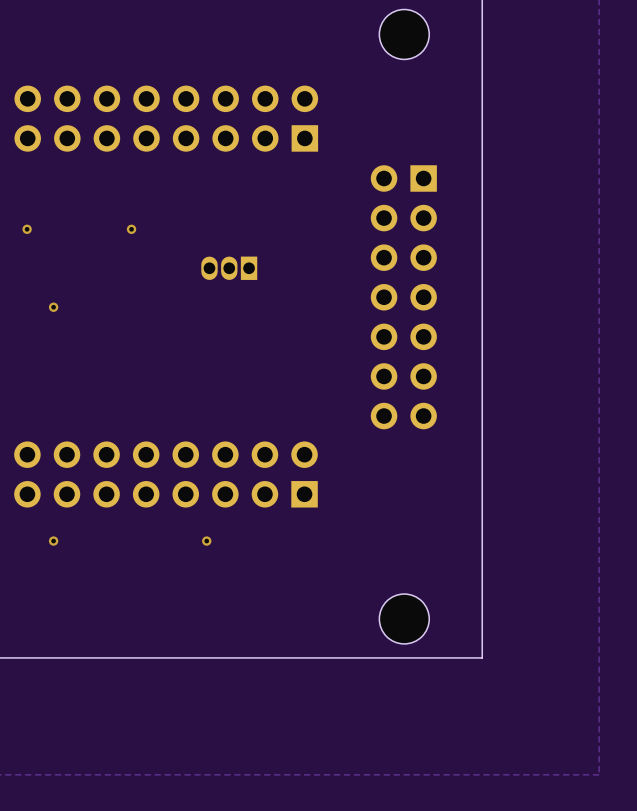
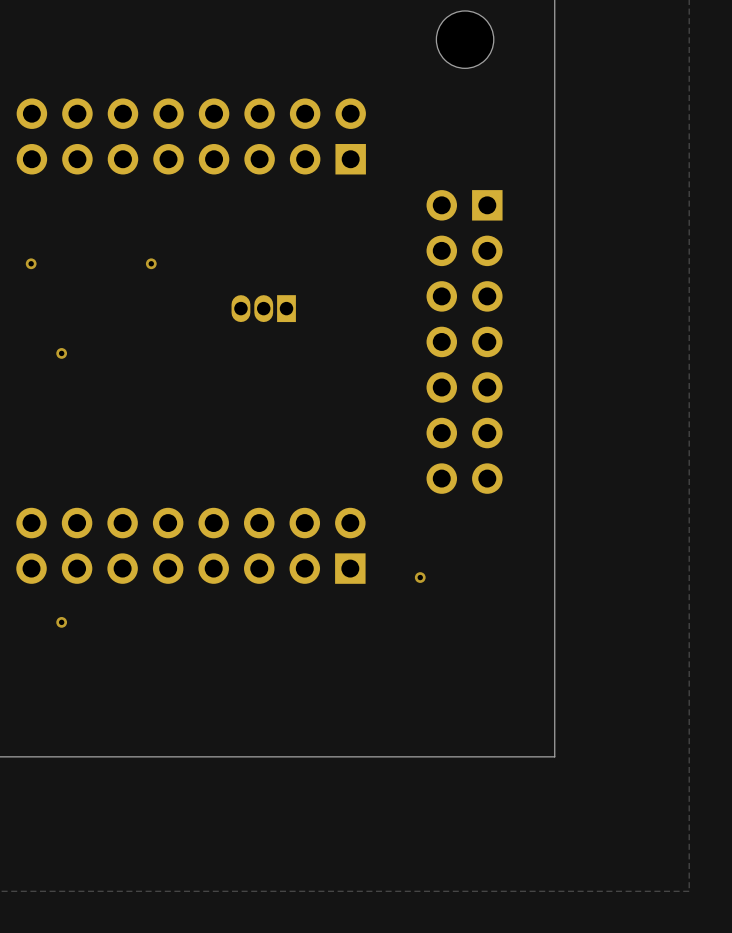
via: none -> (420, 577)
via: (206, 541) -> none
part: (404, 618) -> none

